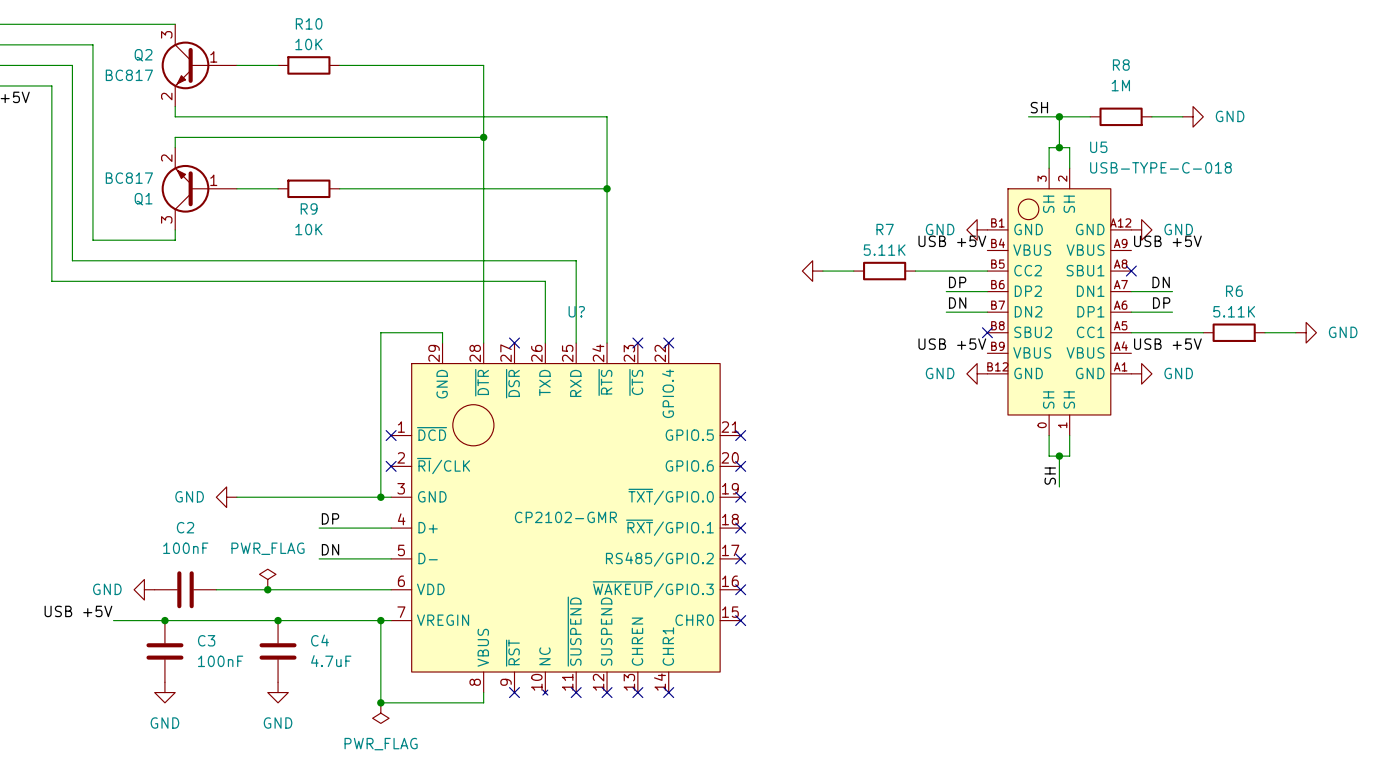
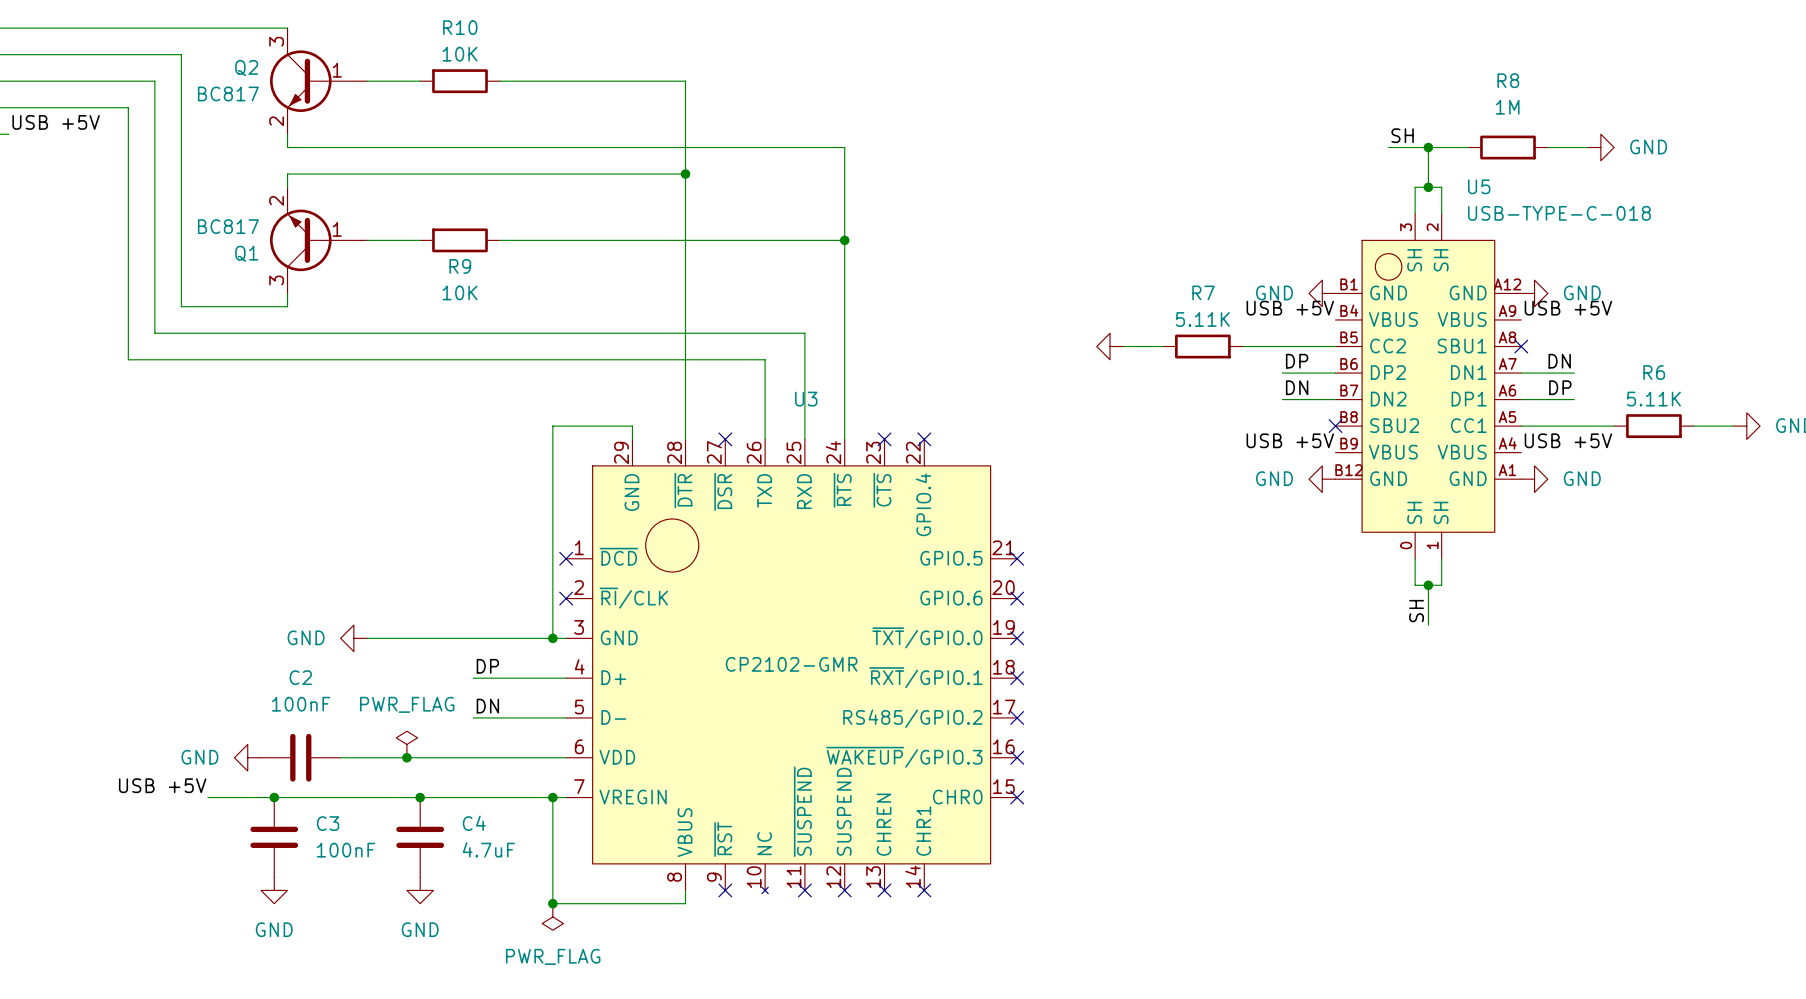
U? name: U? (576, 311) -> U3 (806, 399)

